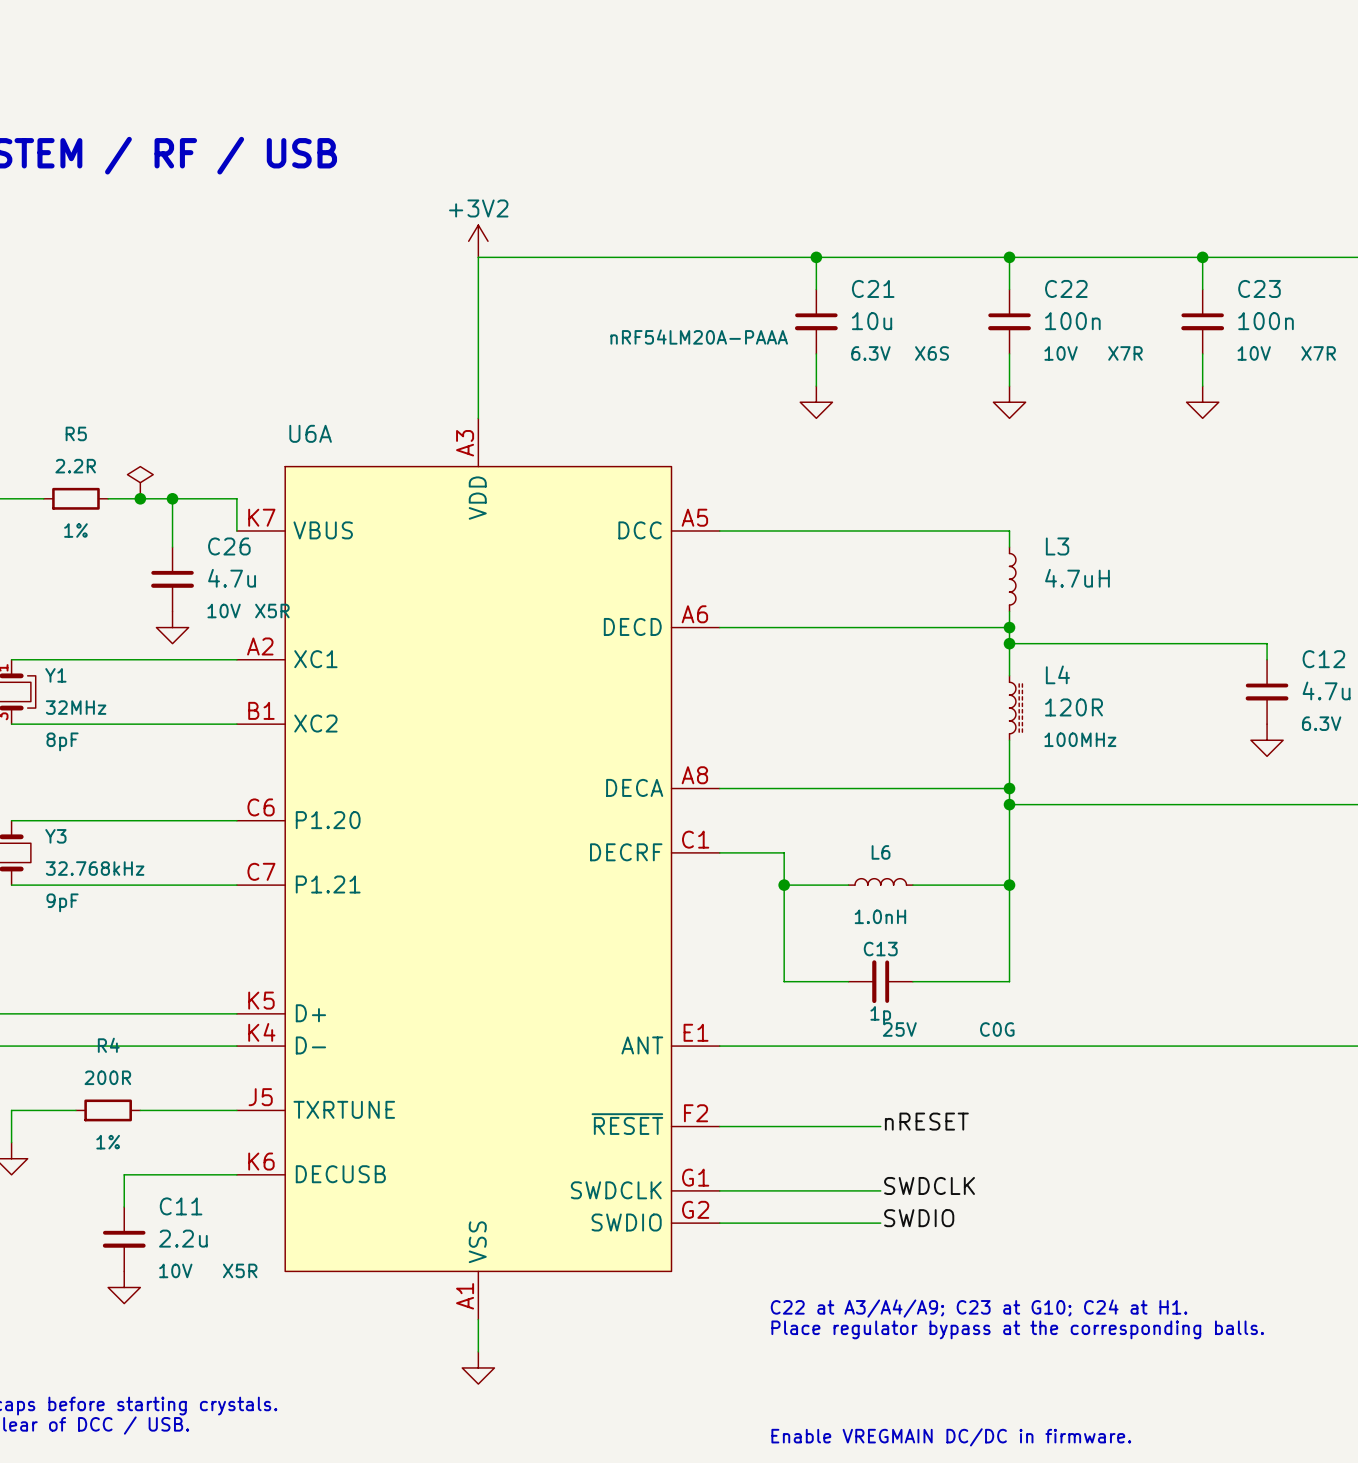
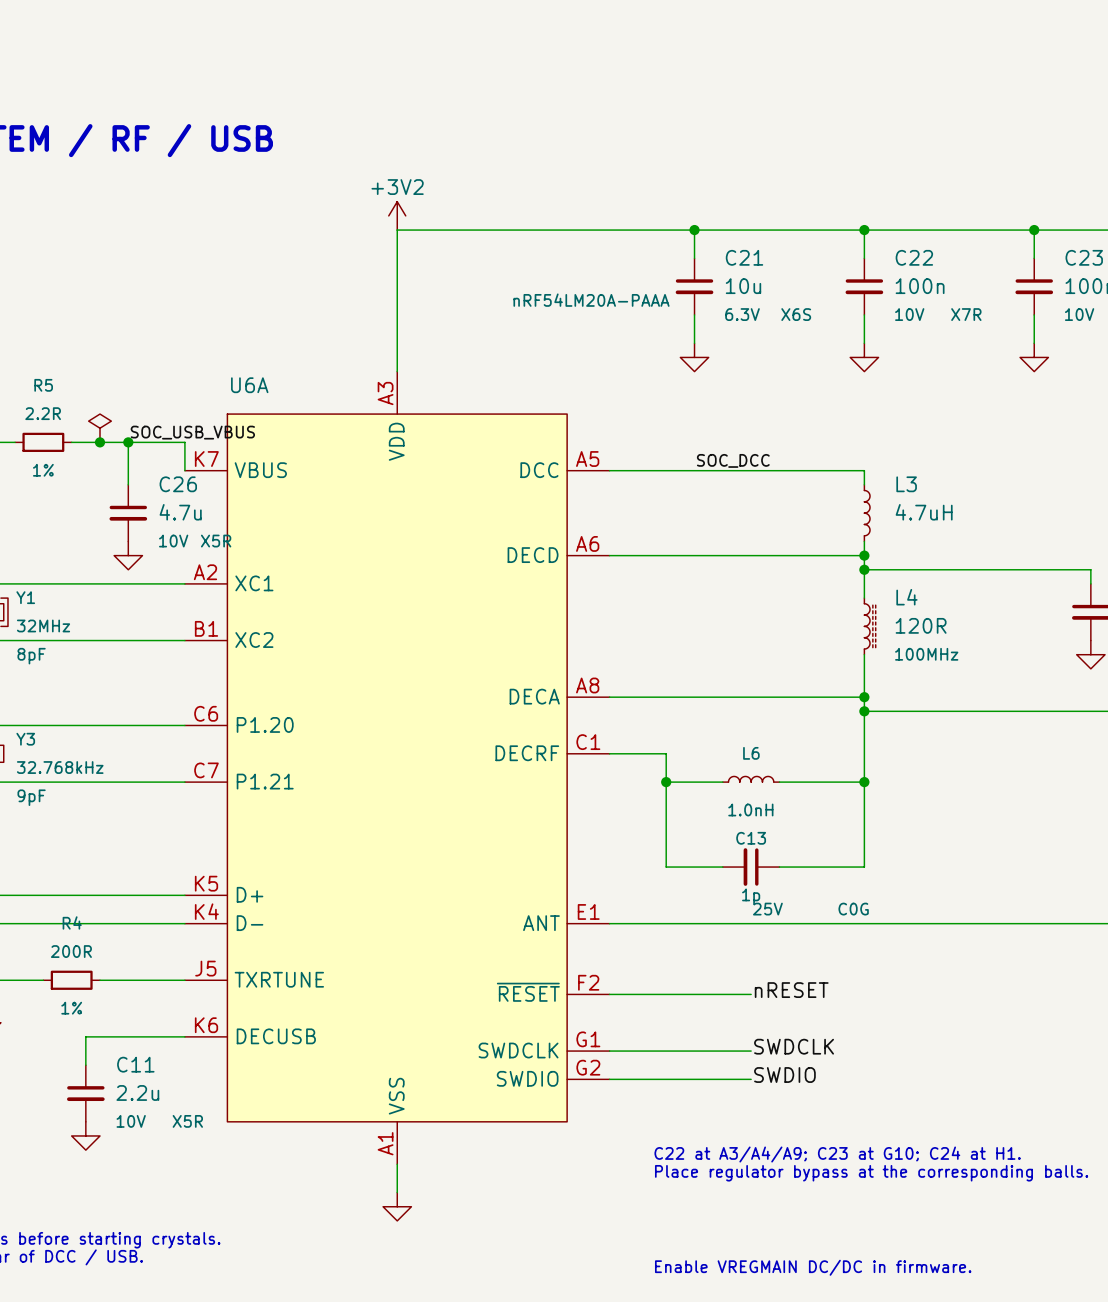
label: none -> SOC_USB_VBUS (192, 432)
label: none -> SOC_DCC (733, 460)

